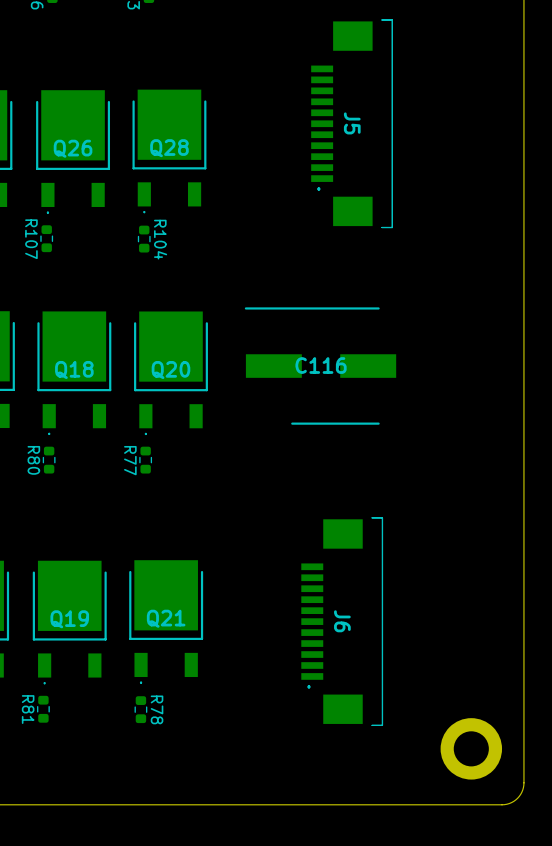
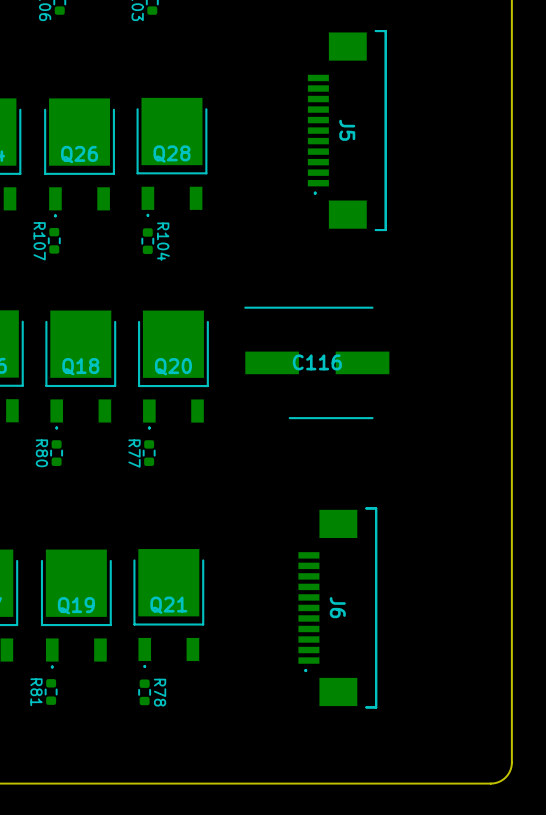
part: (471, 748) -> none

